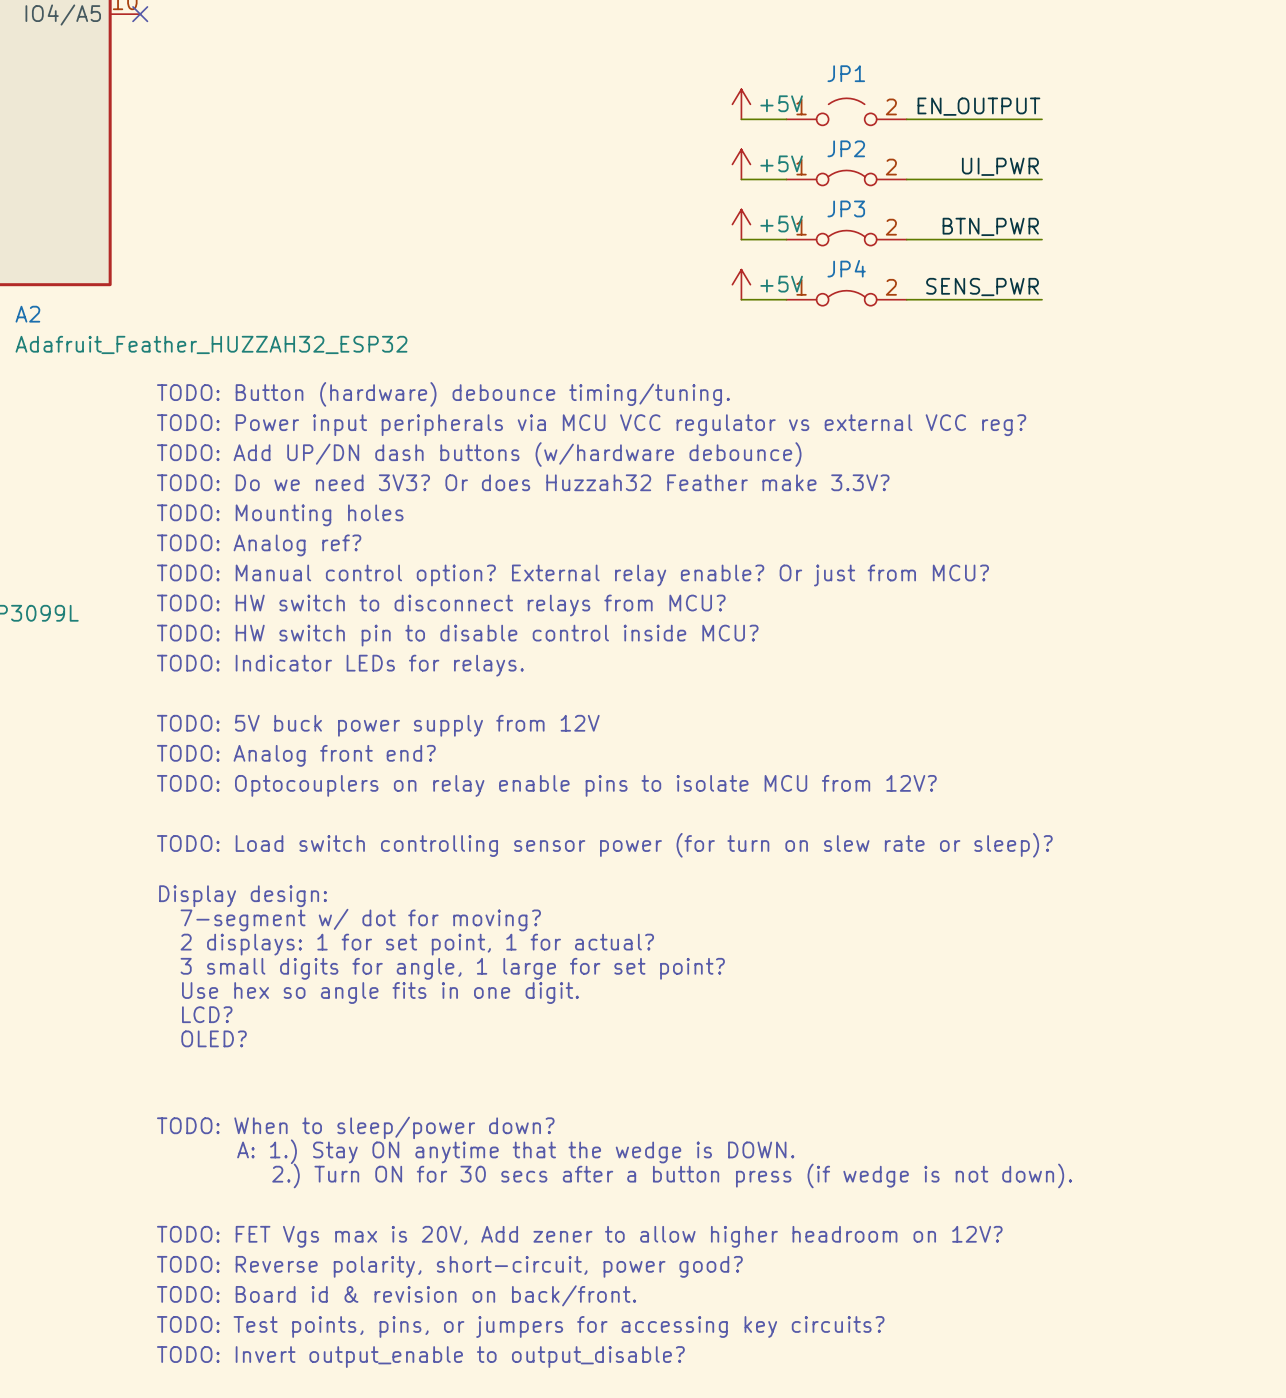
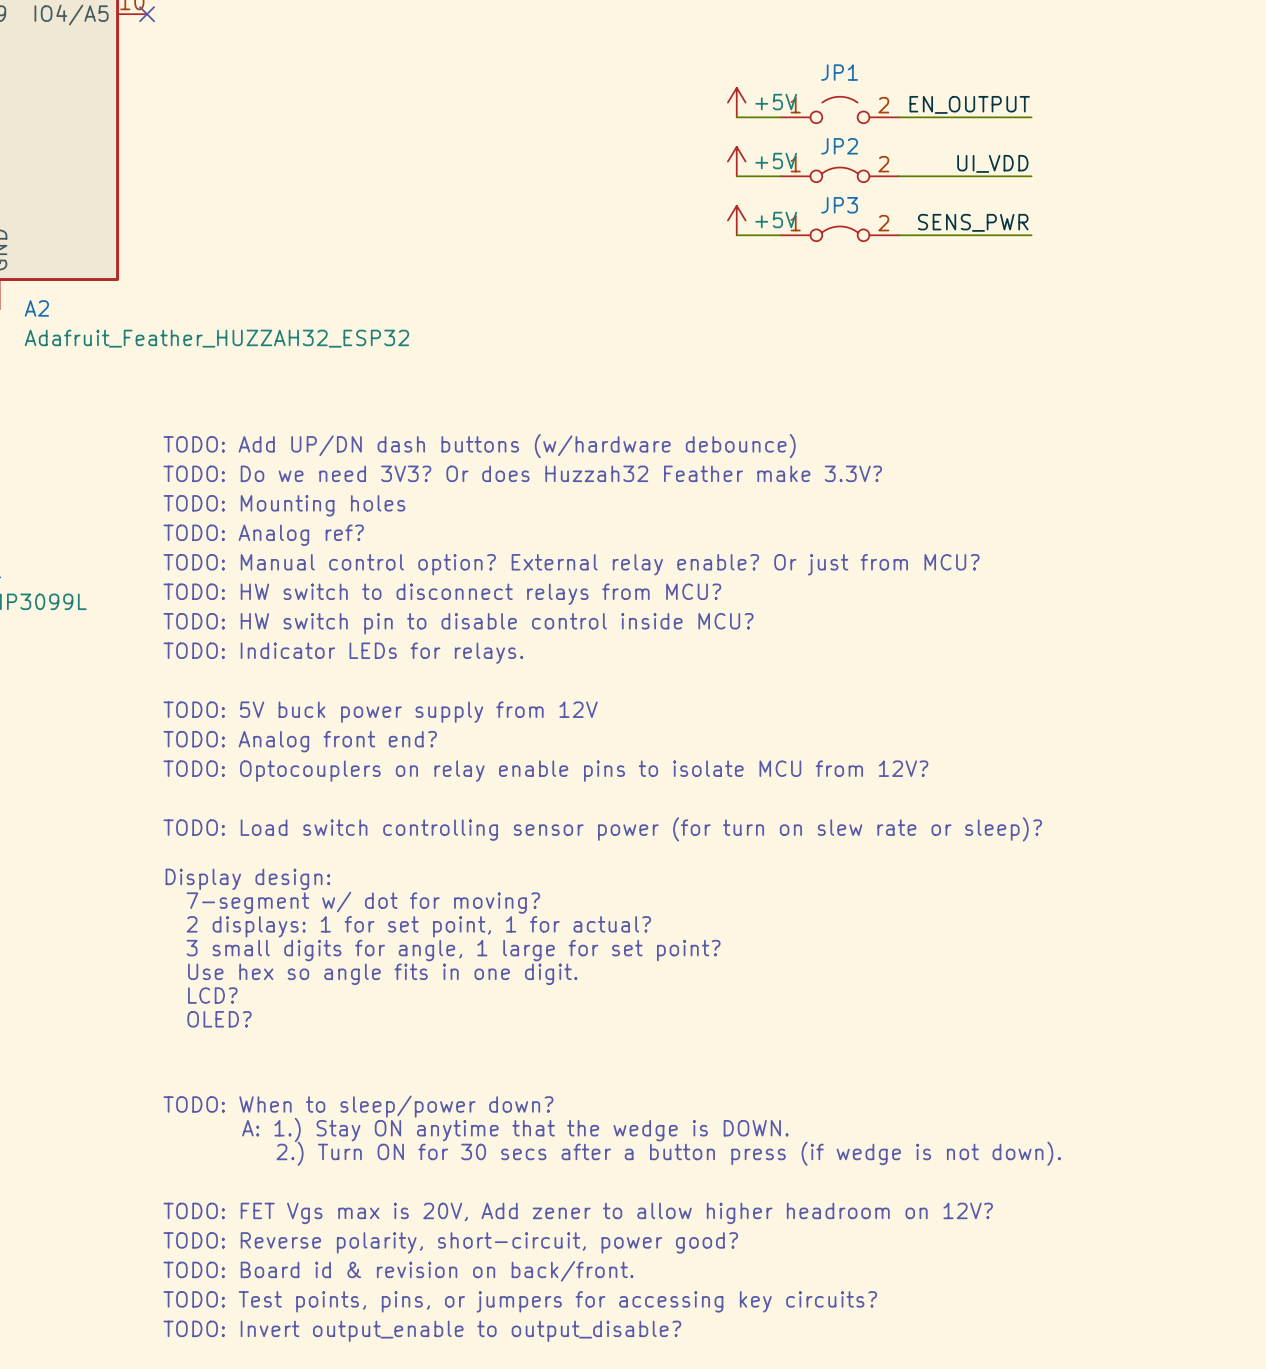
label: UI_PWR (1000, 166) -> UI_VDD (992, 163)
label: BTN_PWR (990, 226) -> SENS_PWR (973, 222)
power symbol: +5V (741, 284) -> none
label: SENS_PWR (982, 287) -> none
JP4: (846, 298) -> none
wire: (741, 299) (786, 299) -> none
wire: (906, 299) (1042, 299) -> none
text: TODO: Button (hardware) debounce timing/tuning. (443, 394) -> none
text: TODO: Power input peripherals via MCU VCC regulator vs external VCC reg? (591, 425) -> none

